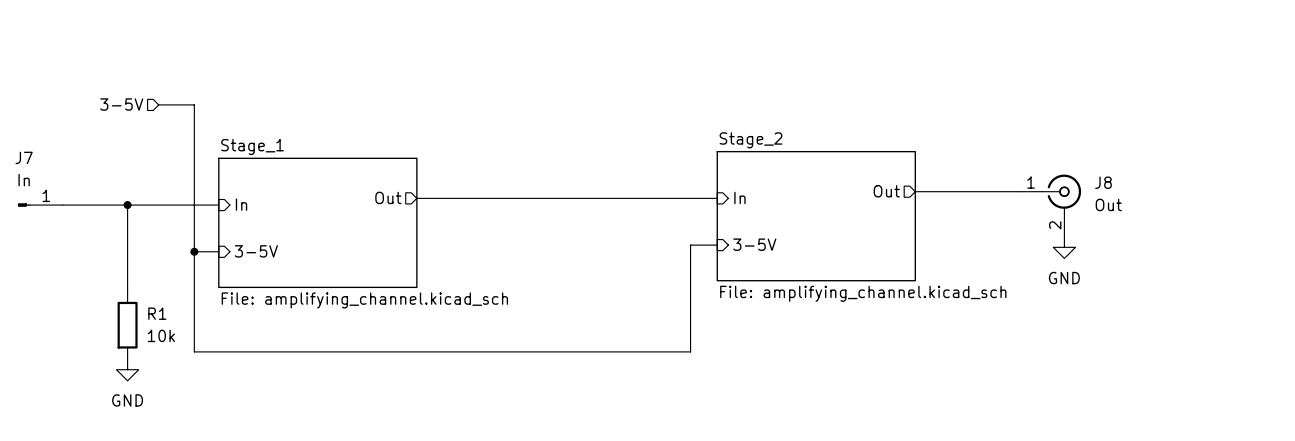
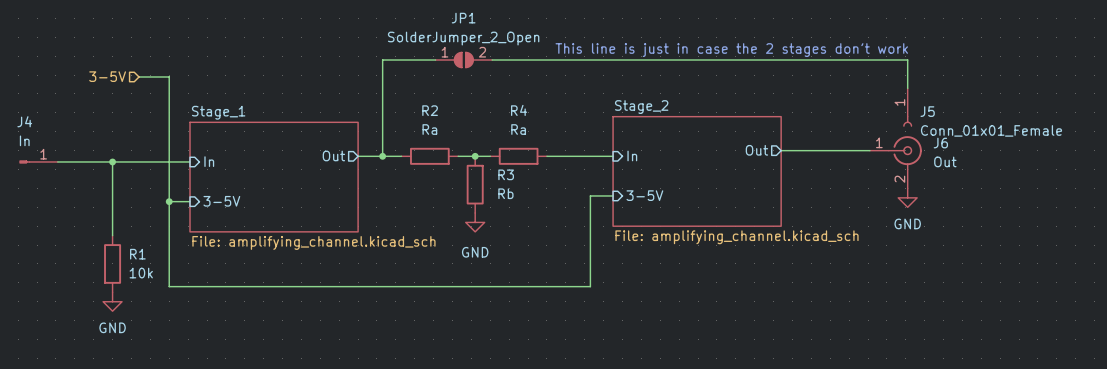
text: none -> This line is just in case the 2 stages don't work (731, 50)
wire: none -> (435, 60) (382, 60) (382, 156)
JP1: none -> SolderJumper_2_Open (463, 60)
wire: none -> (492, 60) (907, 60) (907, 88)
J5: none -> Conn_01x01_Female (907, 107)
J7 name: J7 (24, 157) -> J4 (24, 121)
J8 name: J8 (1103, 182) -> J6 (940, 143)
junction: none -> (382, 156)
wire: (468, 198) (534, 198) -> none
R2: none -> Ra (429, 156)
junction: none -> (475, 156)
wire: (572, 198) (639, 198) -> none
R4: none -> Ra (518, 156)
R3: none -> Rb (475, 184)
power symbol: none -> GND (475, 222)

